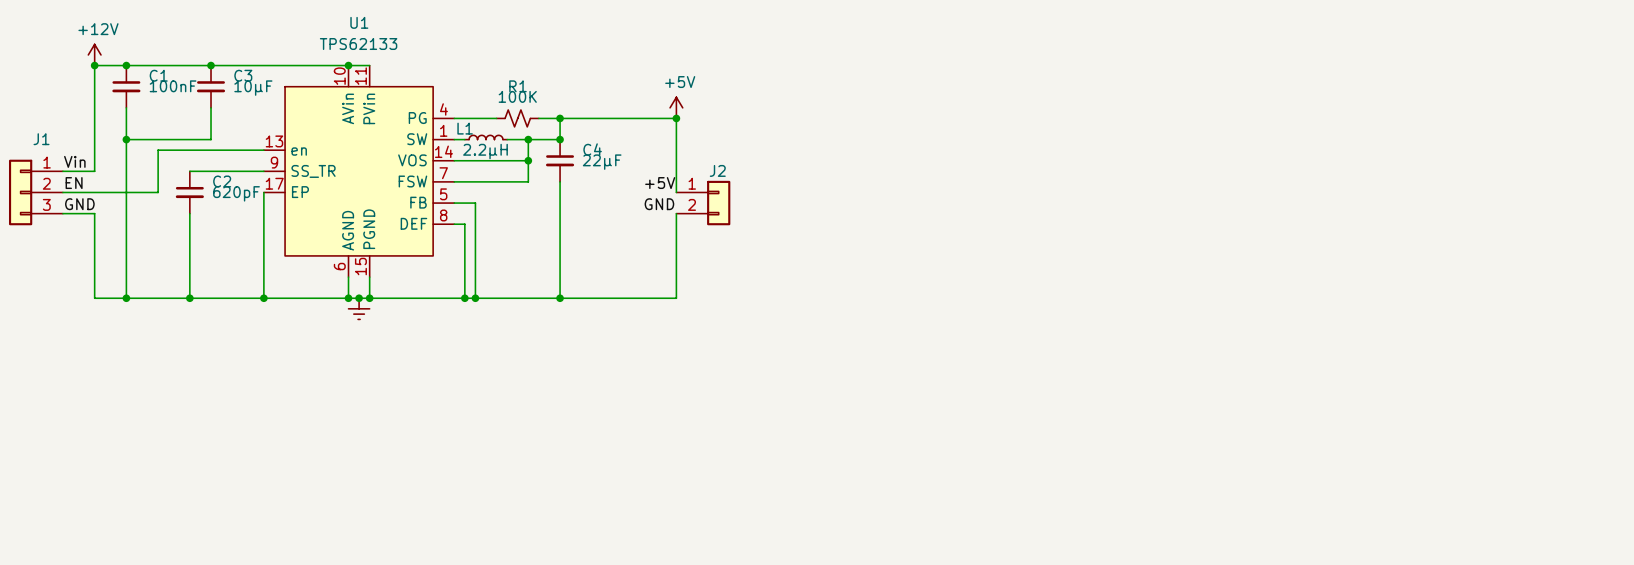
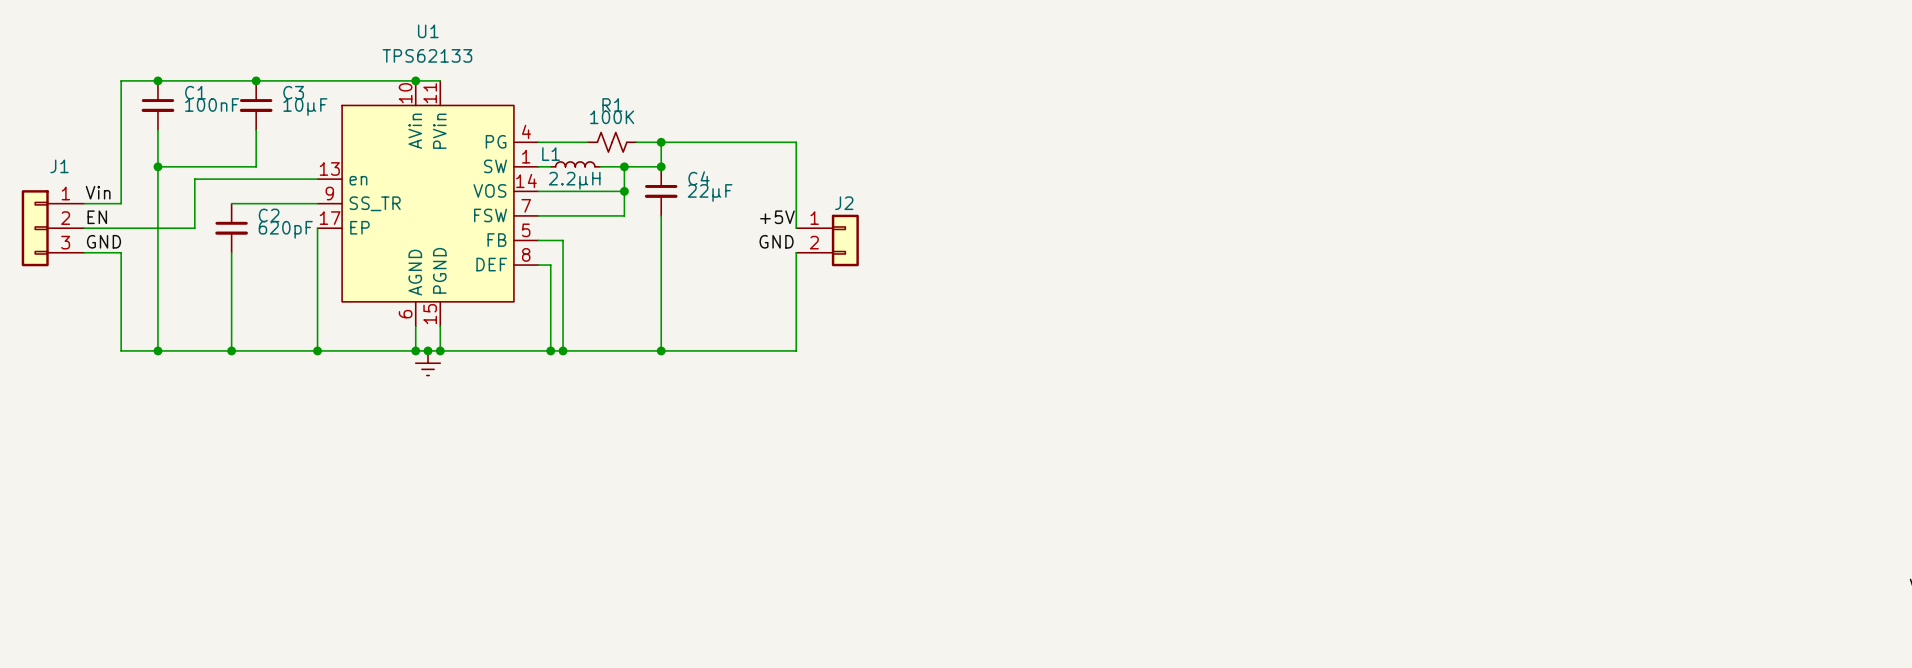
power symbol: +12V (94, 54) -> none
junction: (94, 65) -> none
power symbol: +5V (676, 107) -> none
junction: (676, 118) -> none

